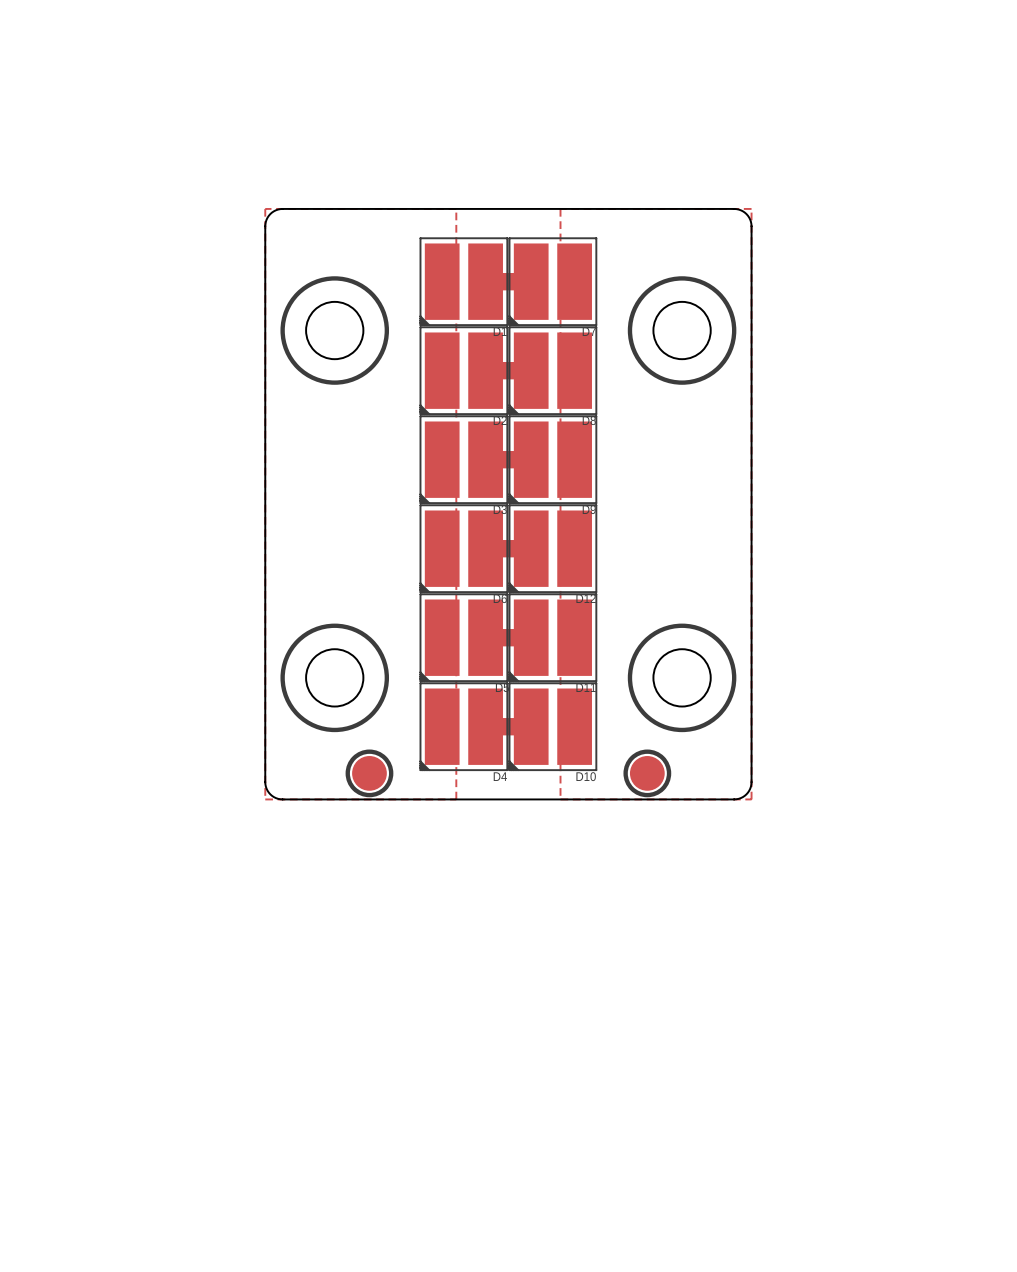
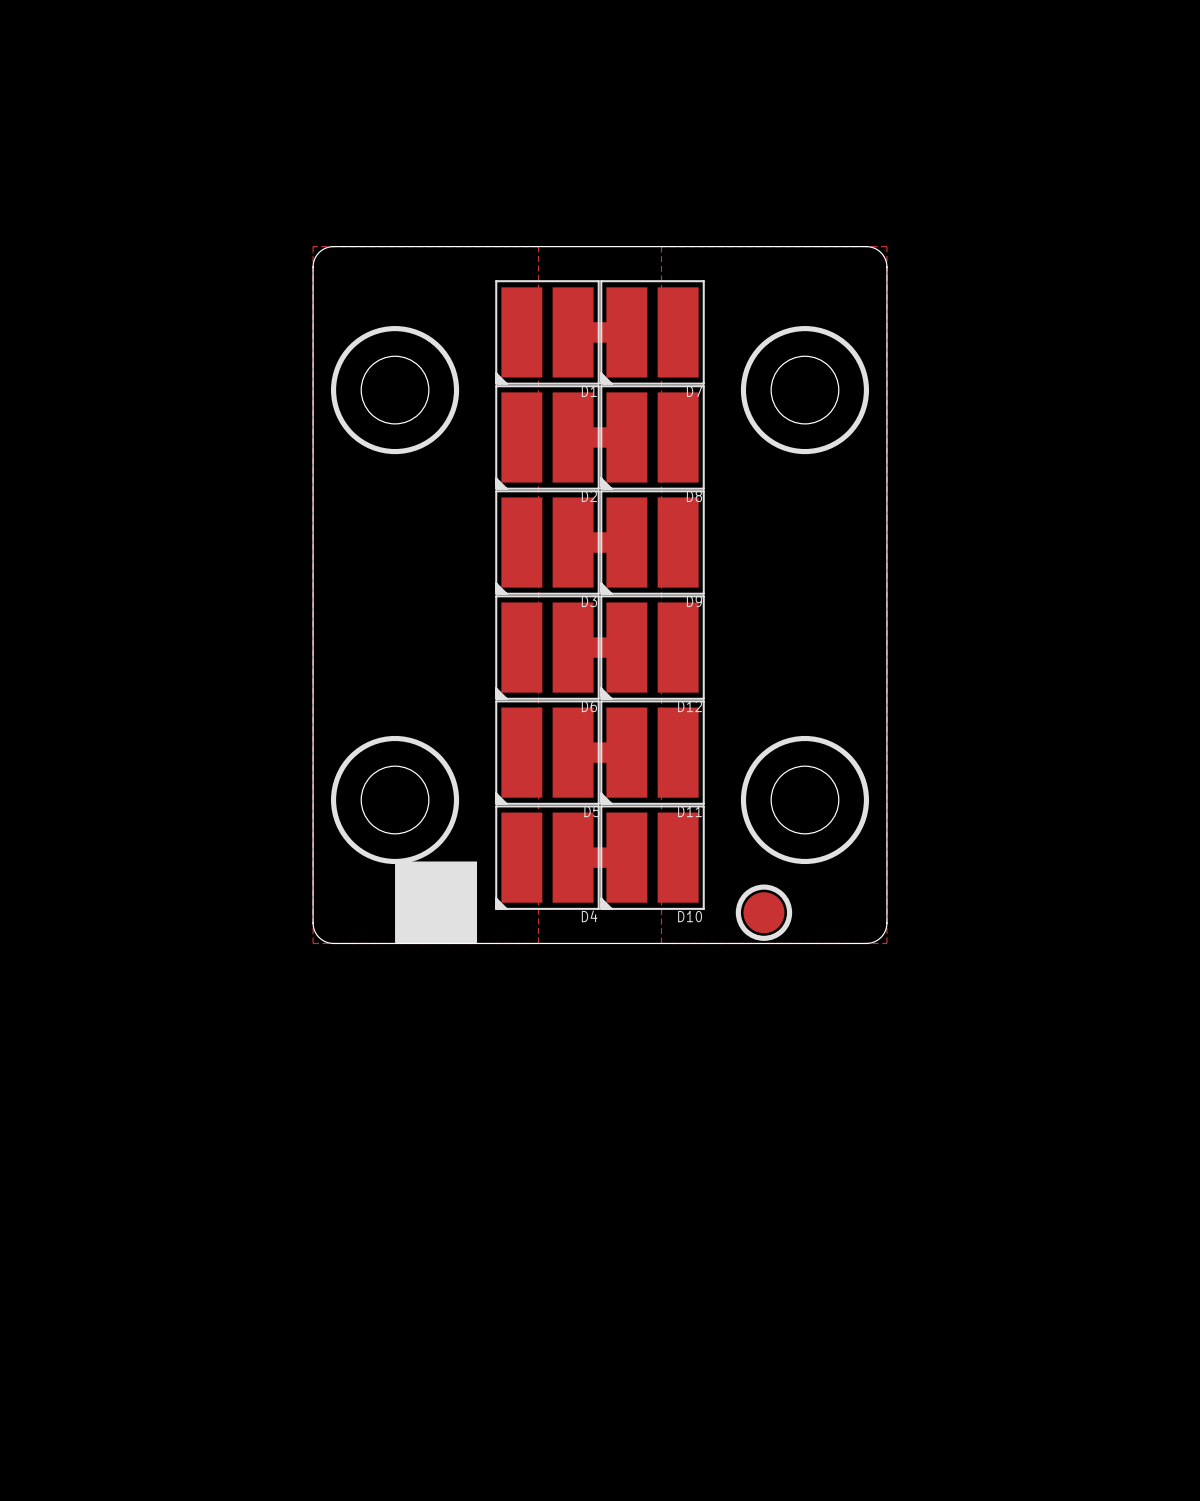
drawing: none -> [395, 861, 478, 944]

